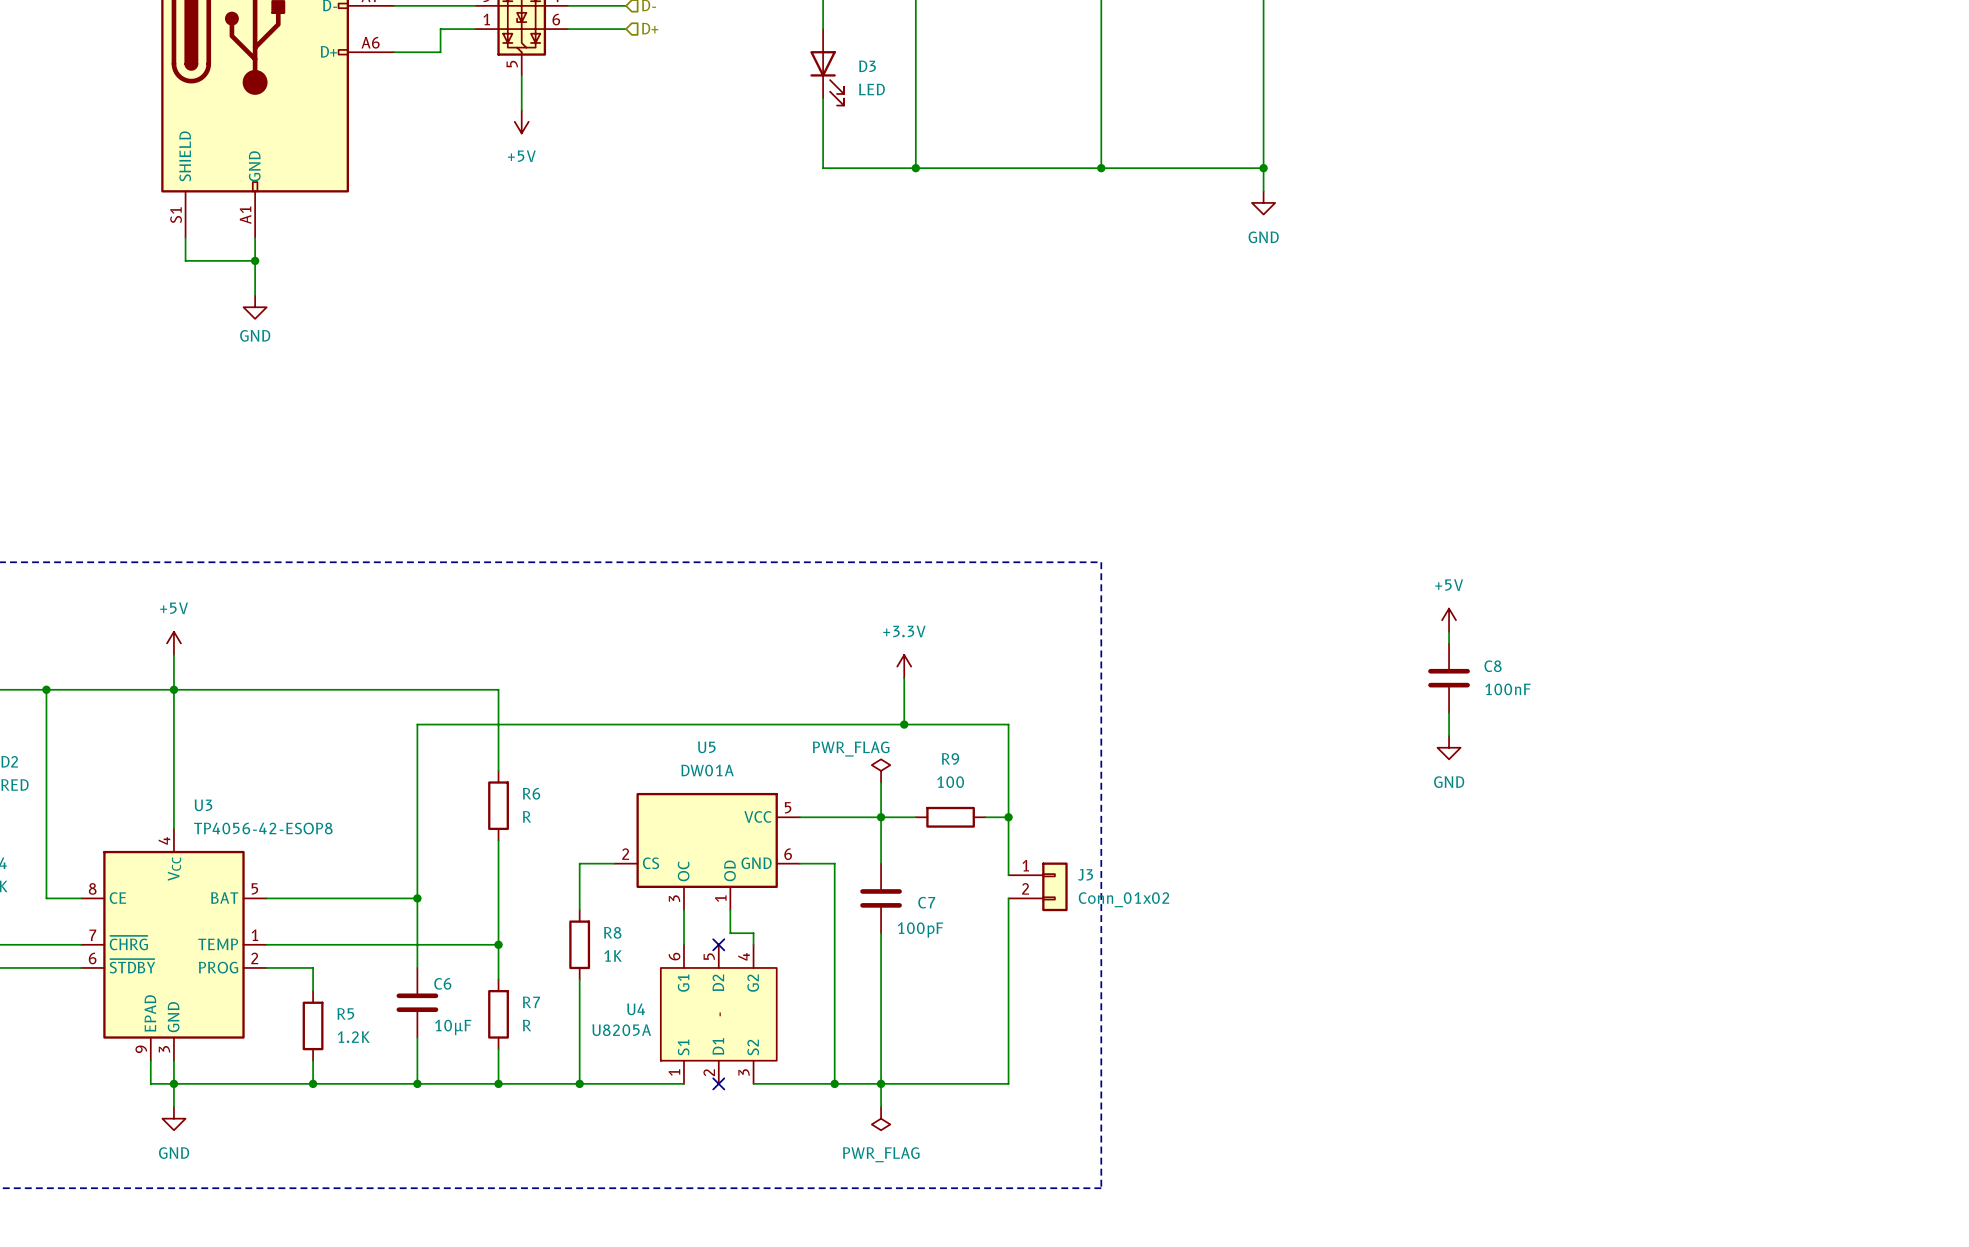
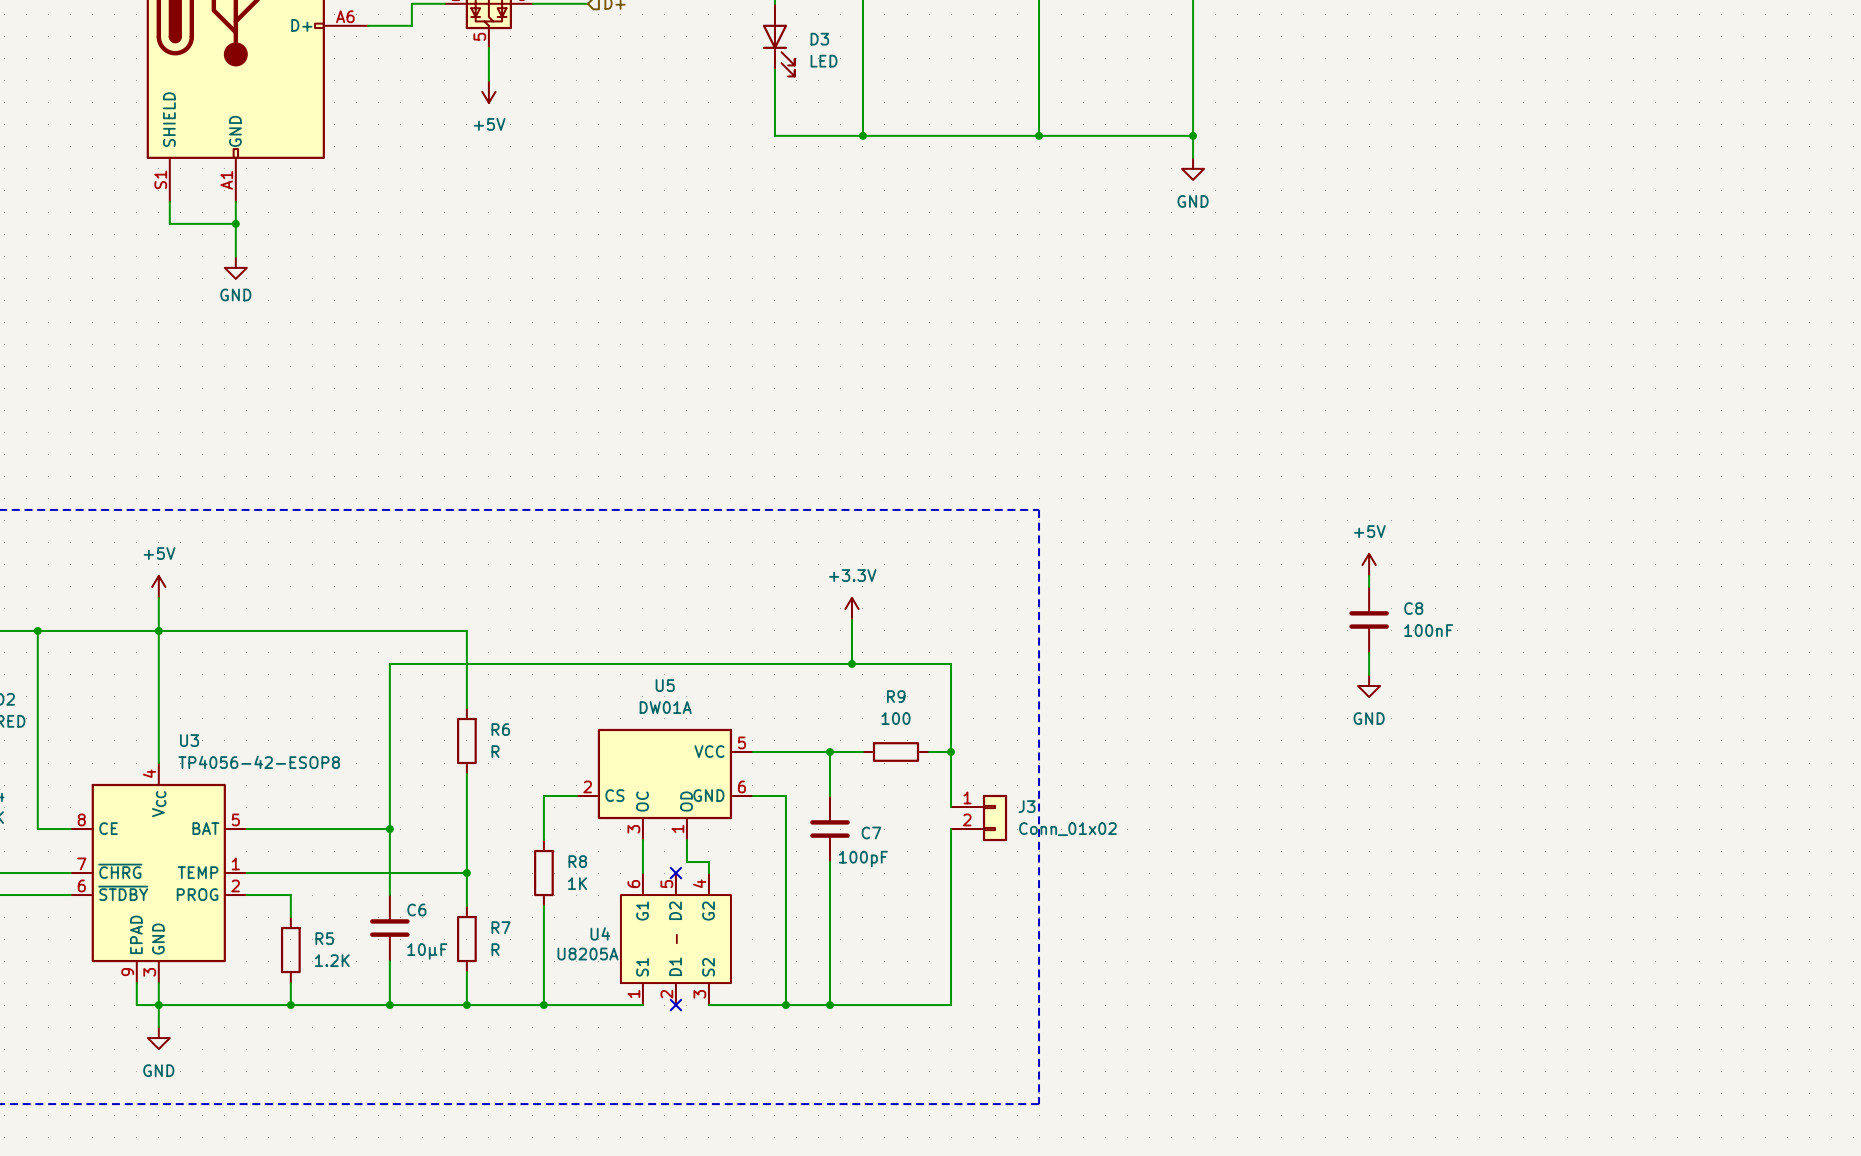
power symbol: PWR_FLAG (881, 770) -> none
wire: (881, 782) (881, 817) -> none
wire: (881, 1083) (881, 1107) -> none
power symbol: PWR_FLAG (881, 1118) -> none

